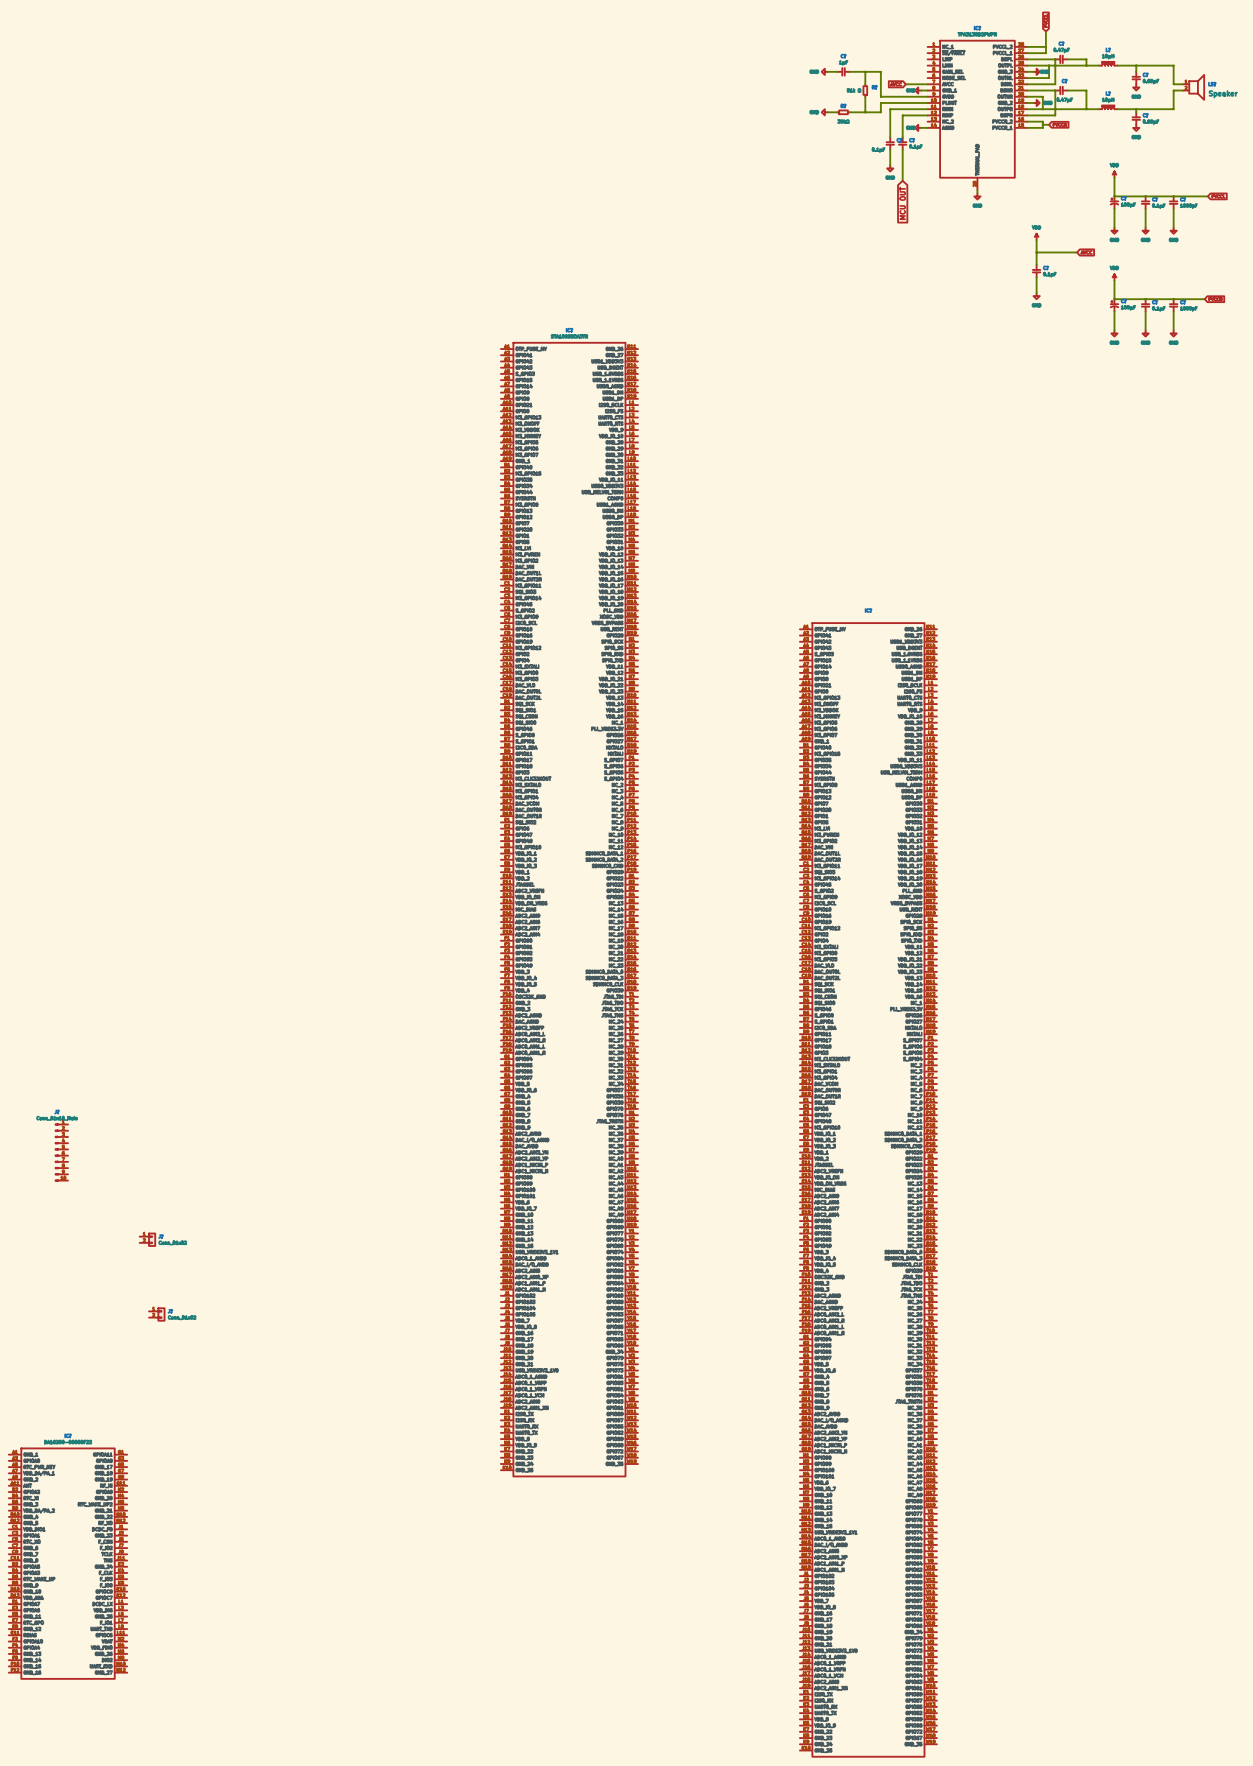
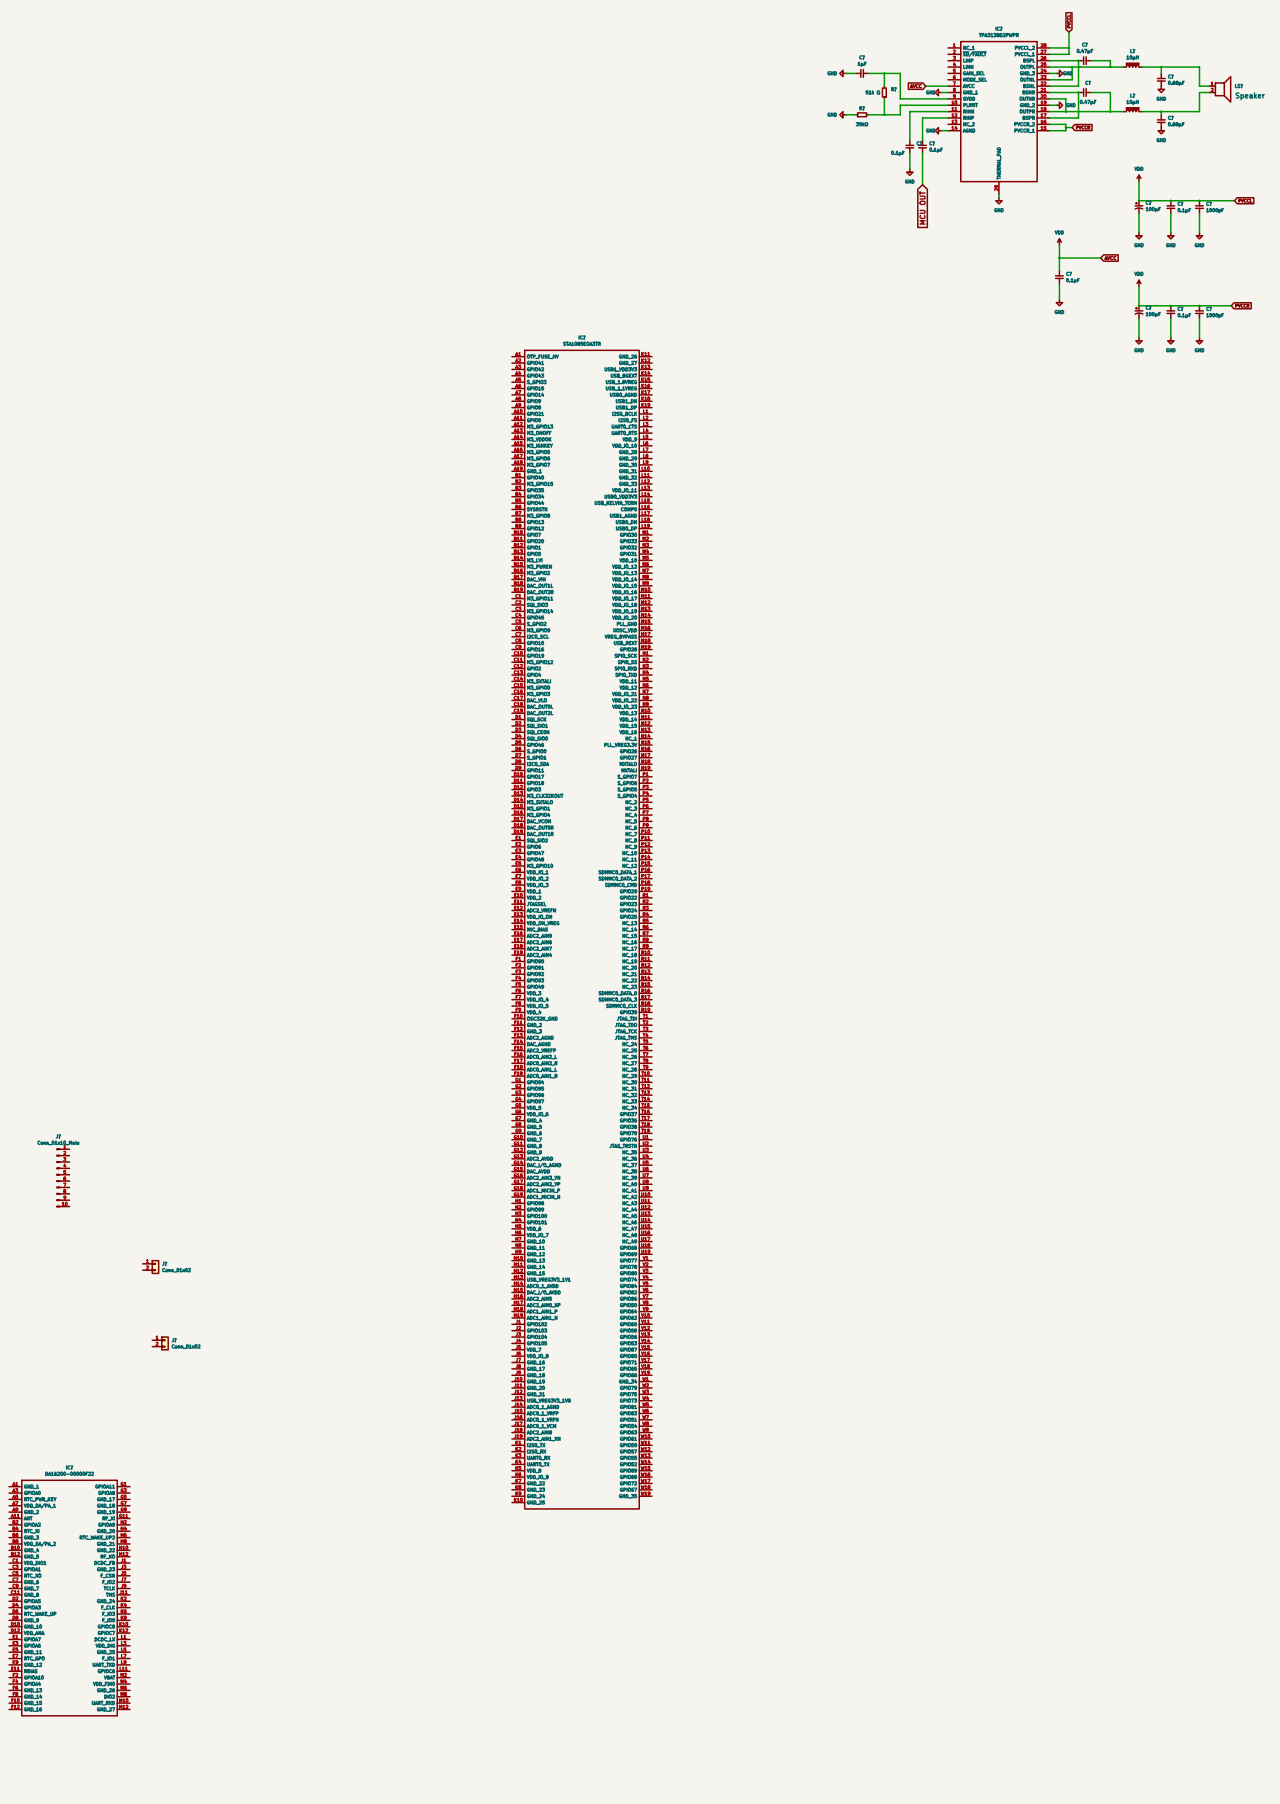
part: (868, 1189) -> none

